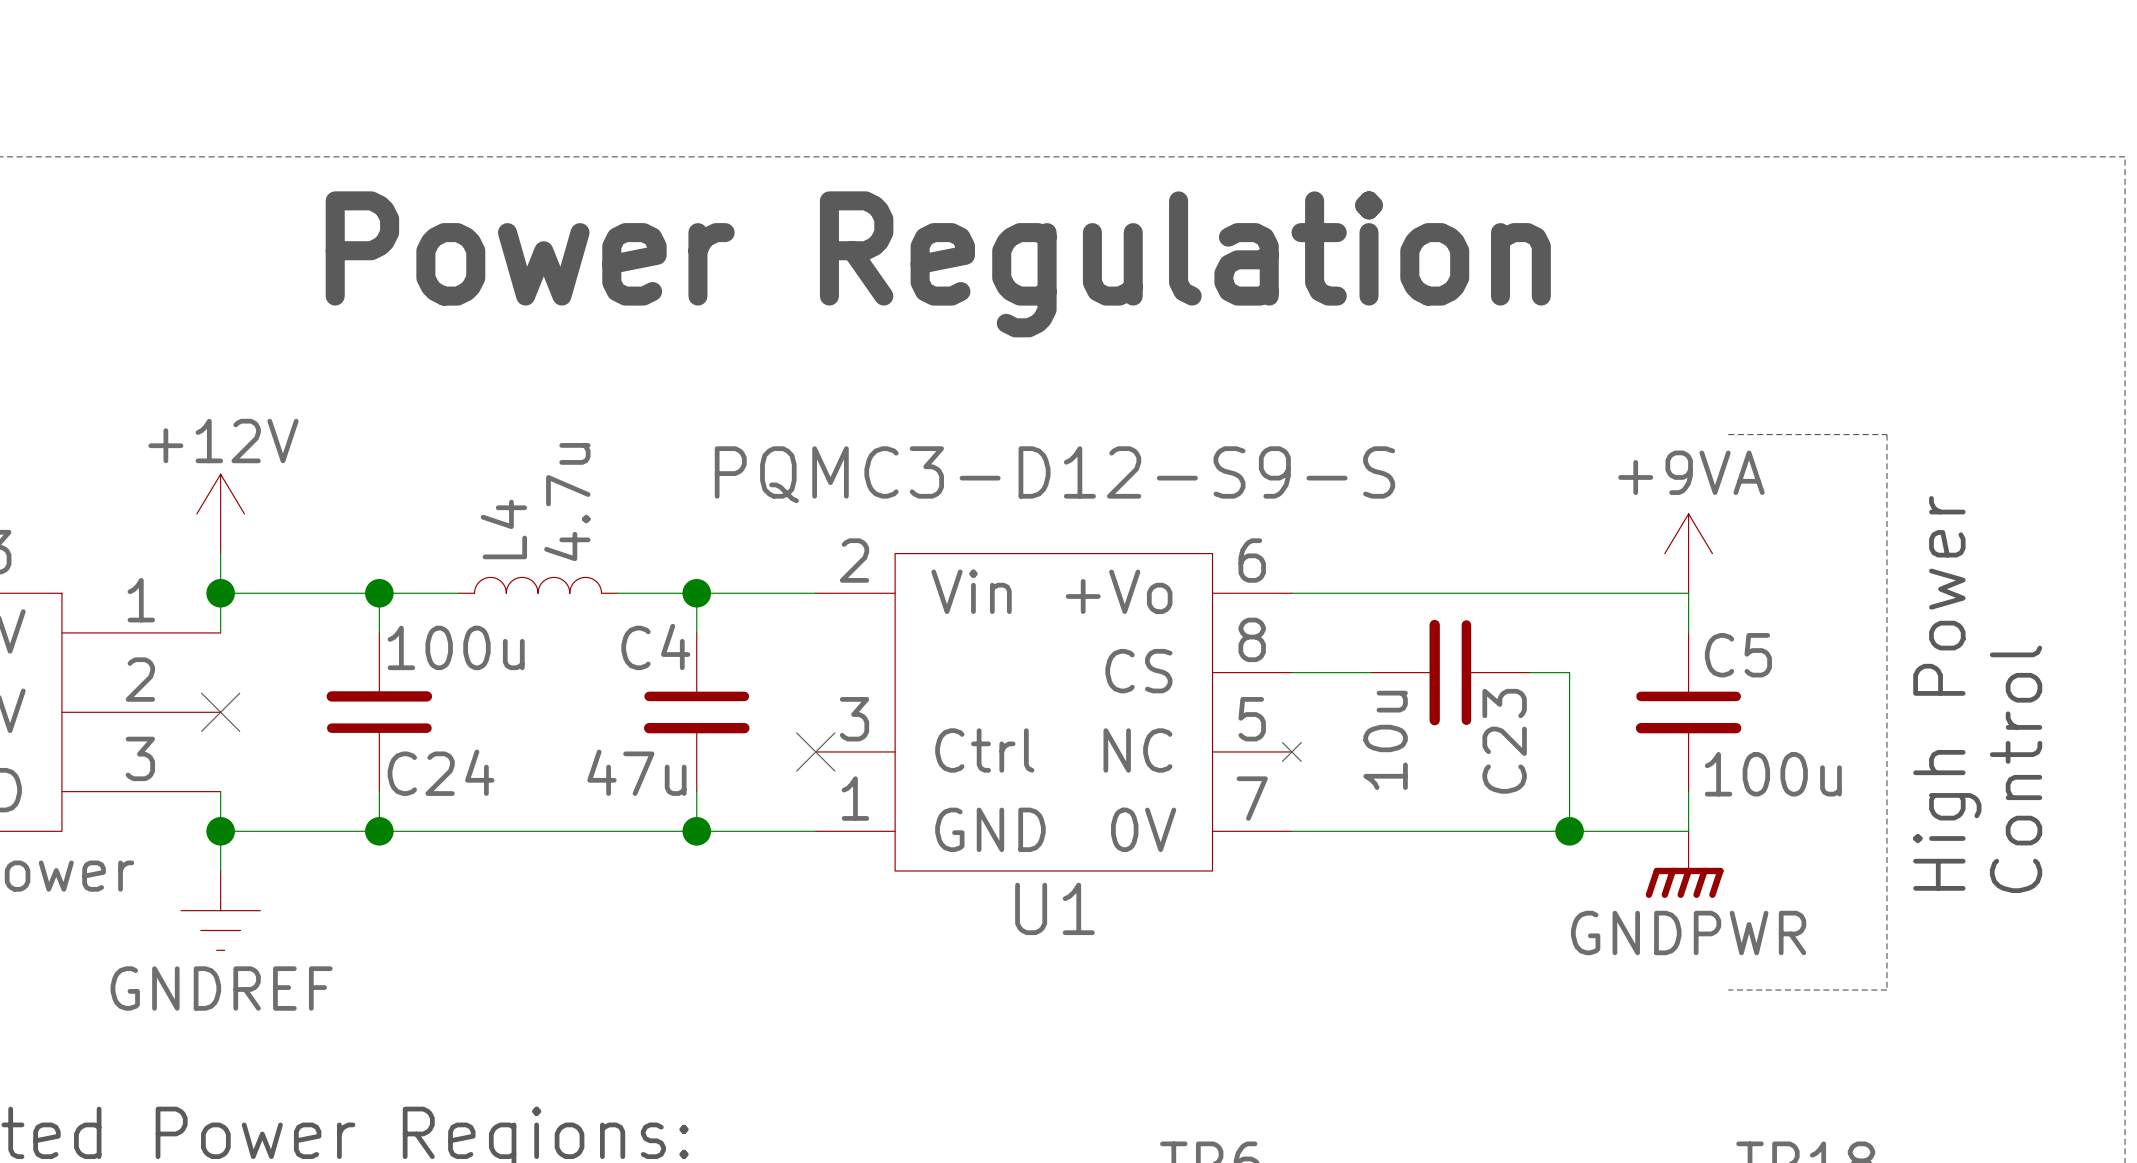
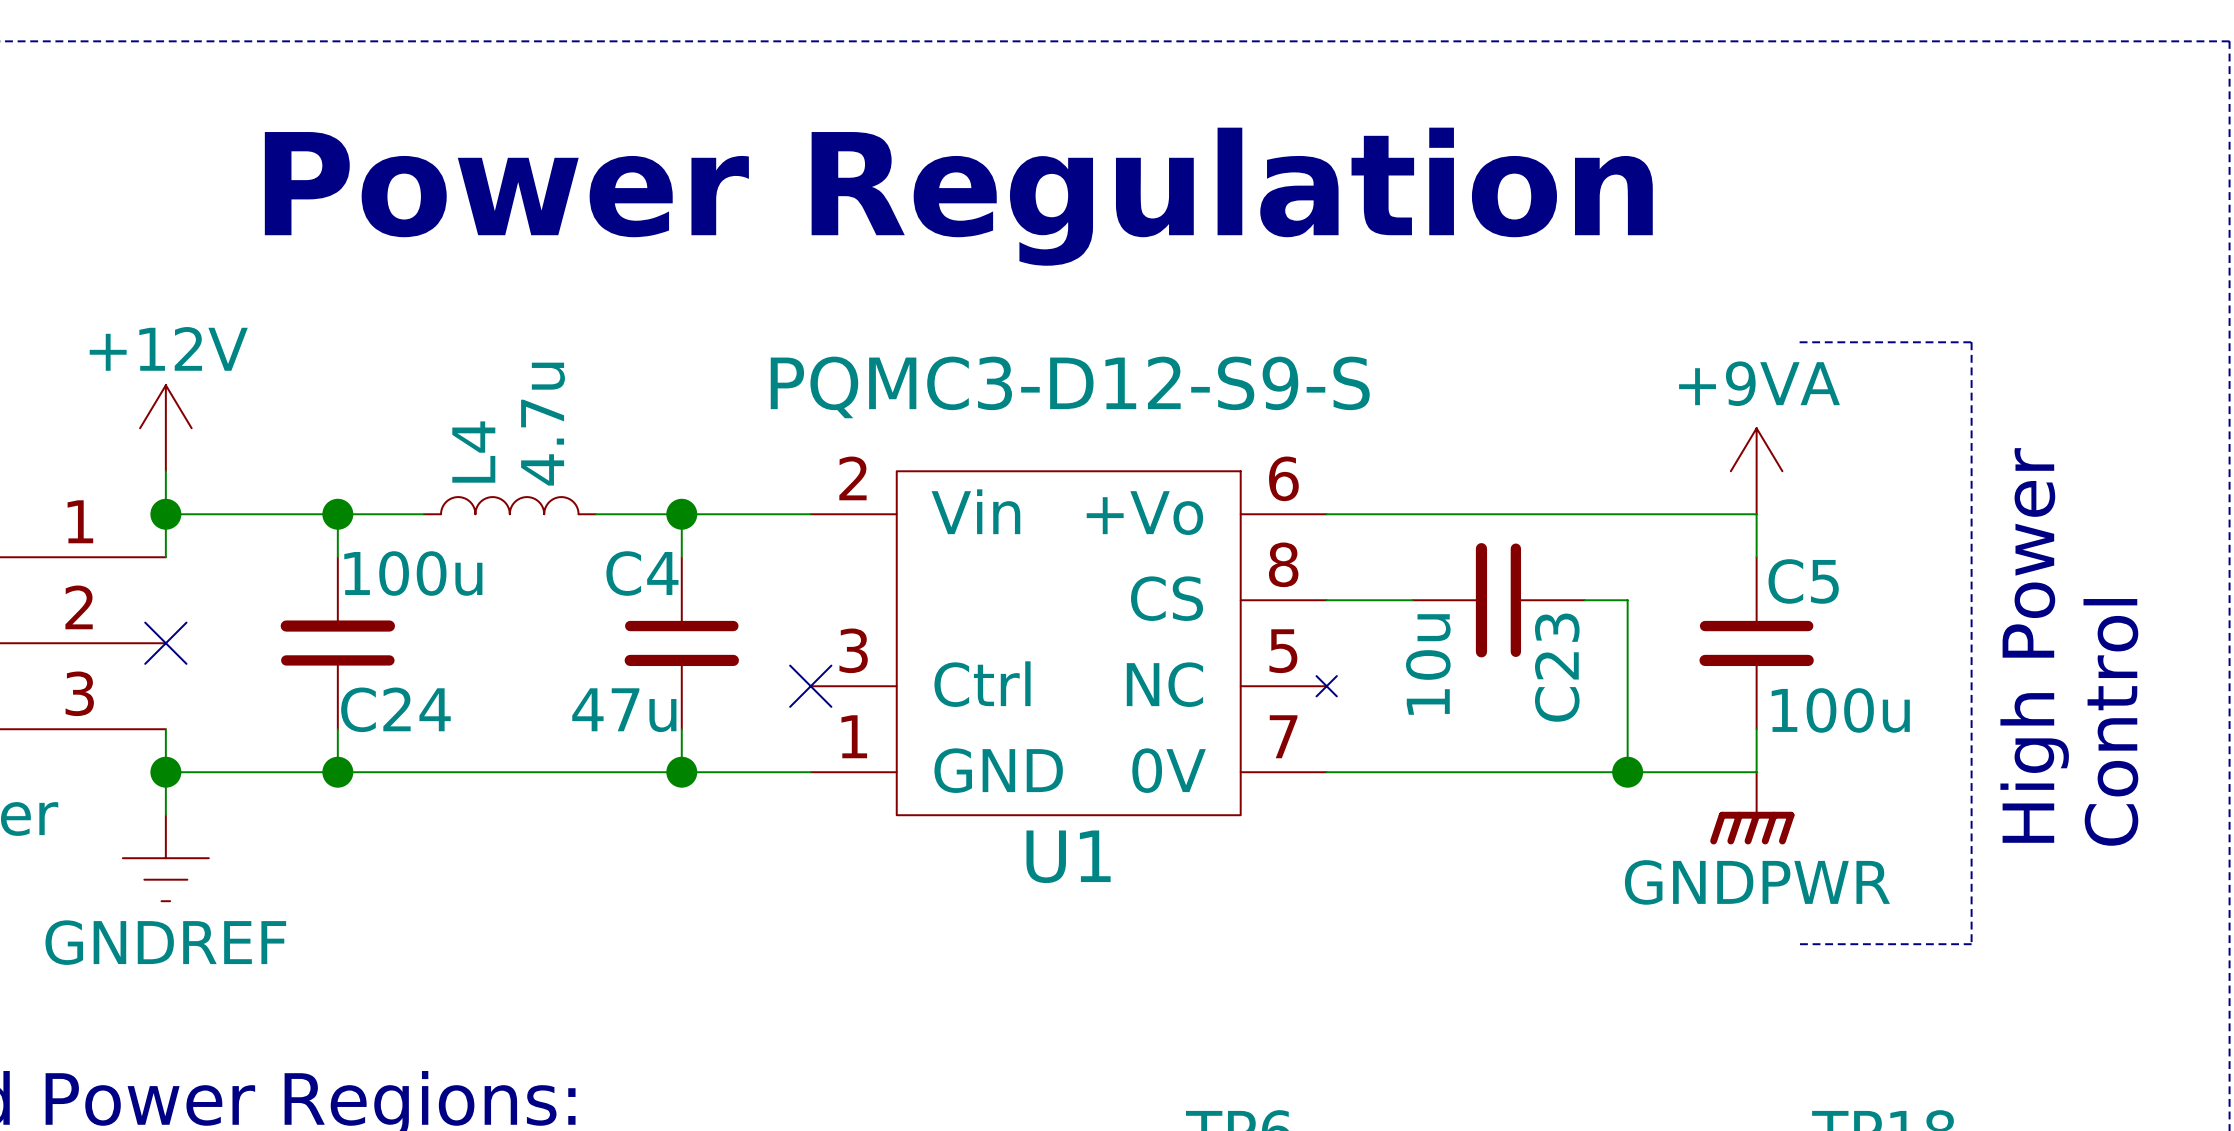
text position: Power Regulation (938, 264) -> Power Regulation (958, 196)

